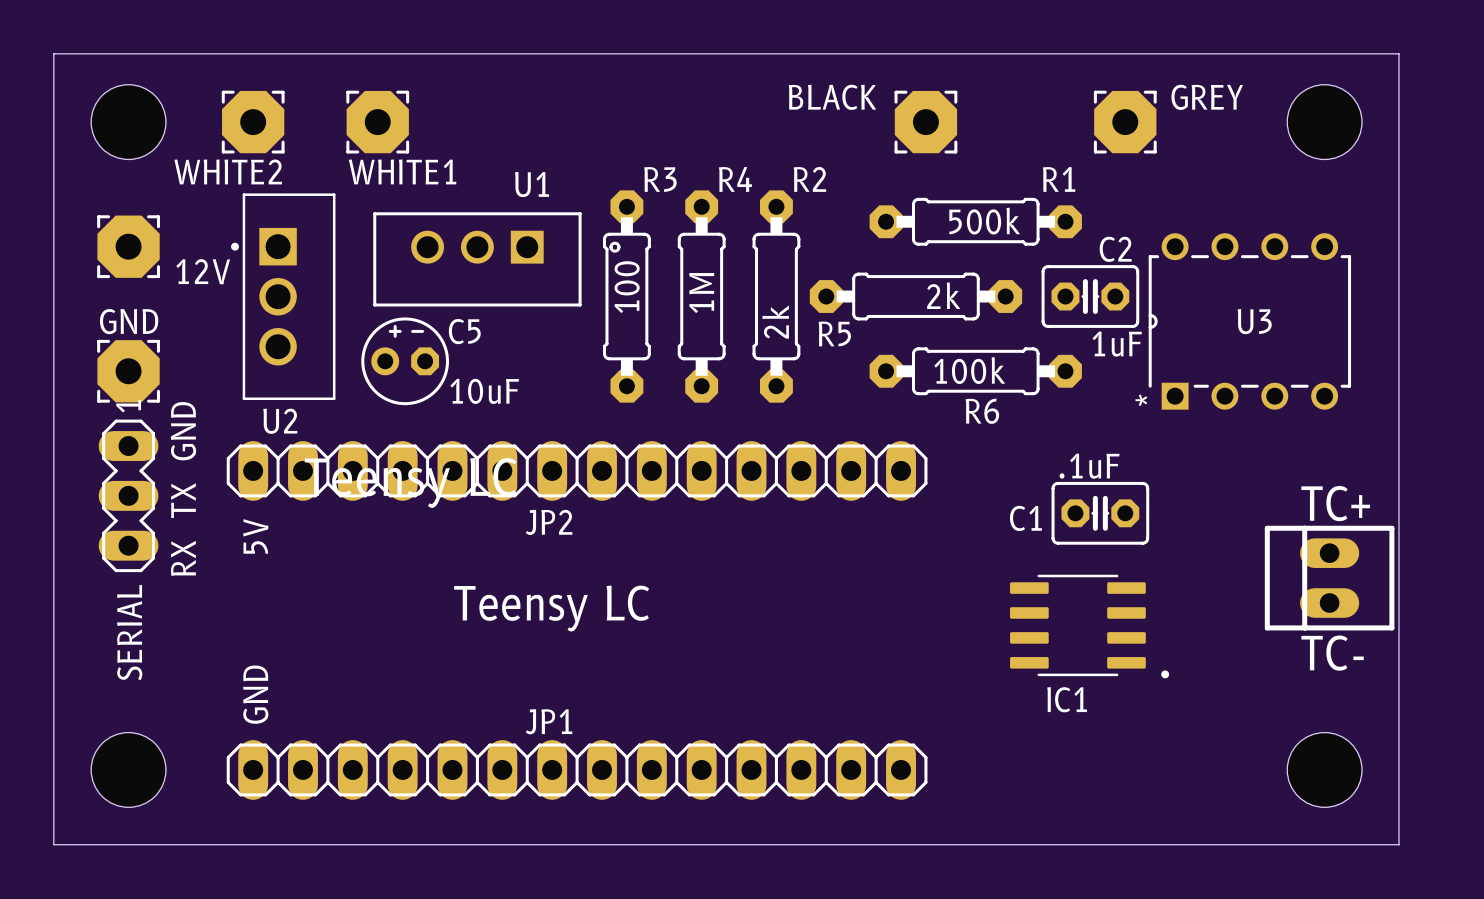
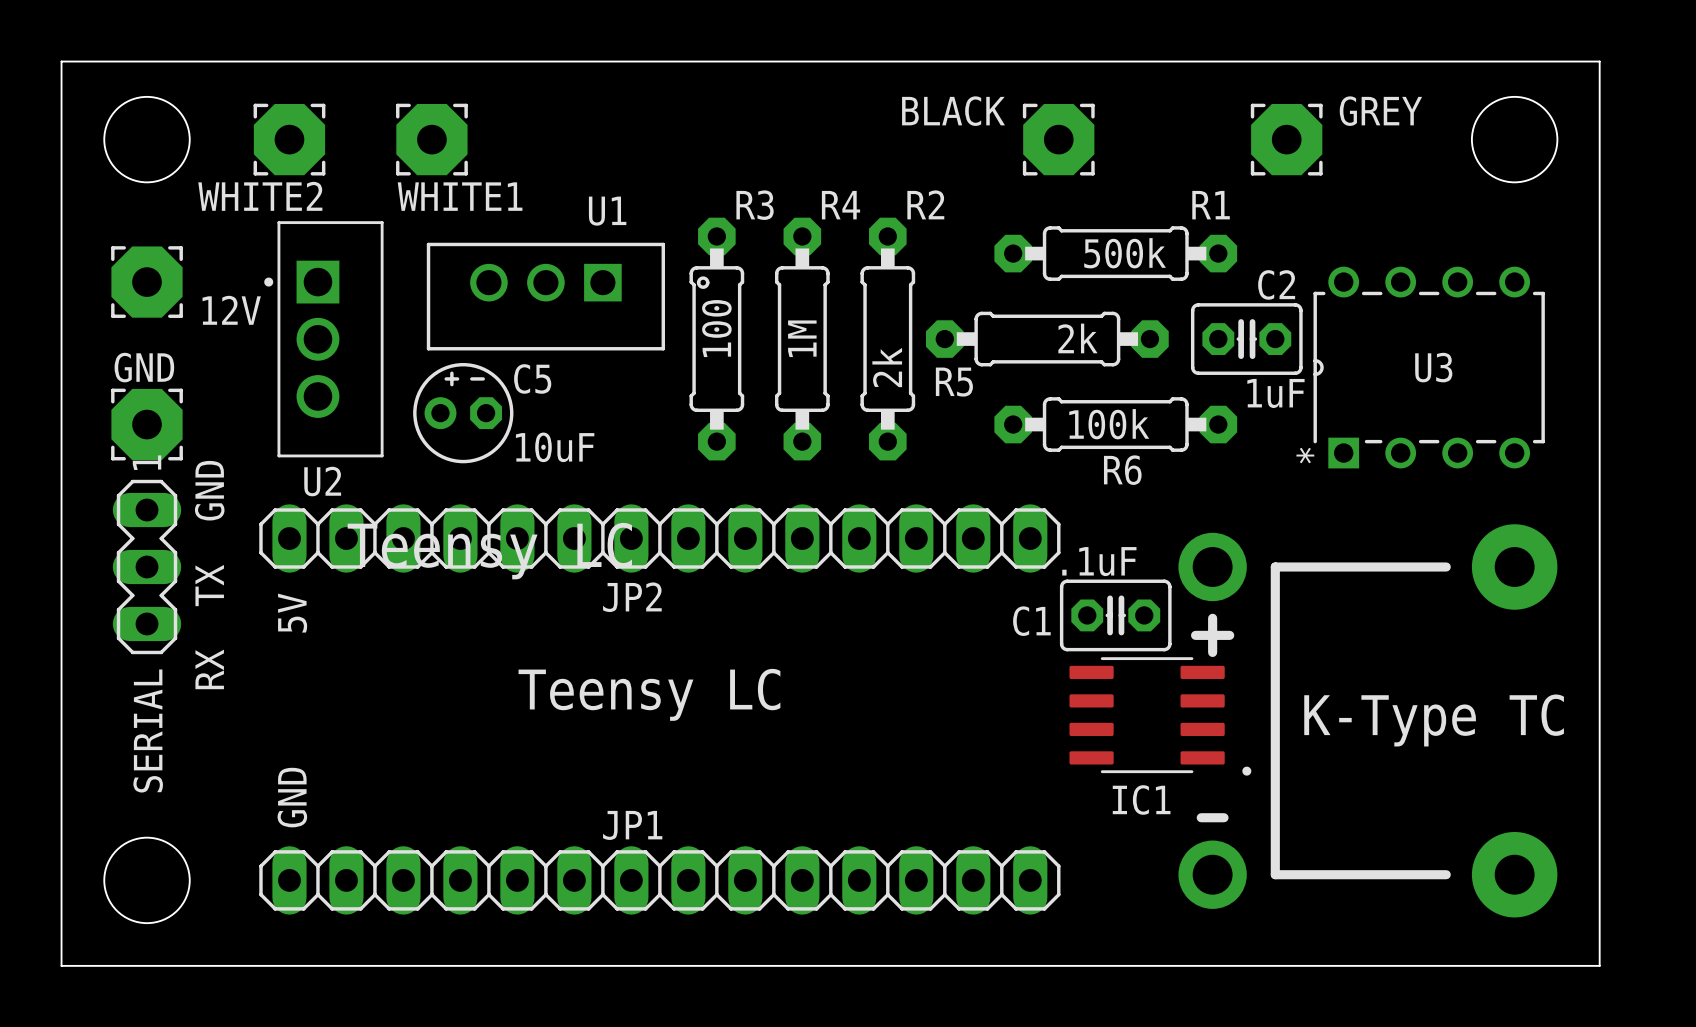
text: TC+ (1335, 503) -> none
C1 position: (1100, 513) -> (1115, 615)
part: (1329, 578) -> none
IC1 position: (1089, 626) -> (1160, 716)
part: none -> (1367, 720)
text: none -> K-Type TC (1434, 720)
text: TC- (1332, 653) -> none
hole: (1324, 769) -> none

